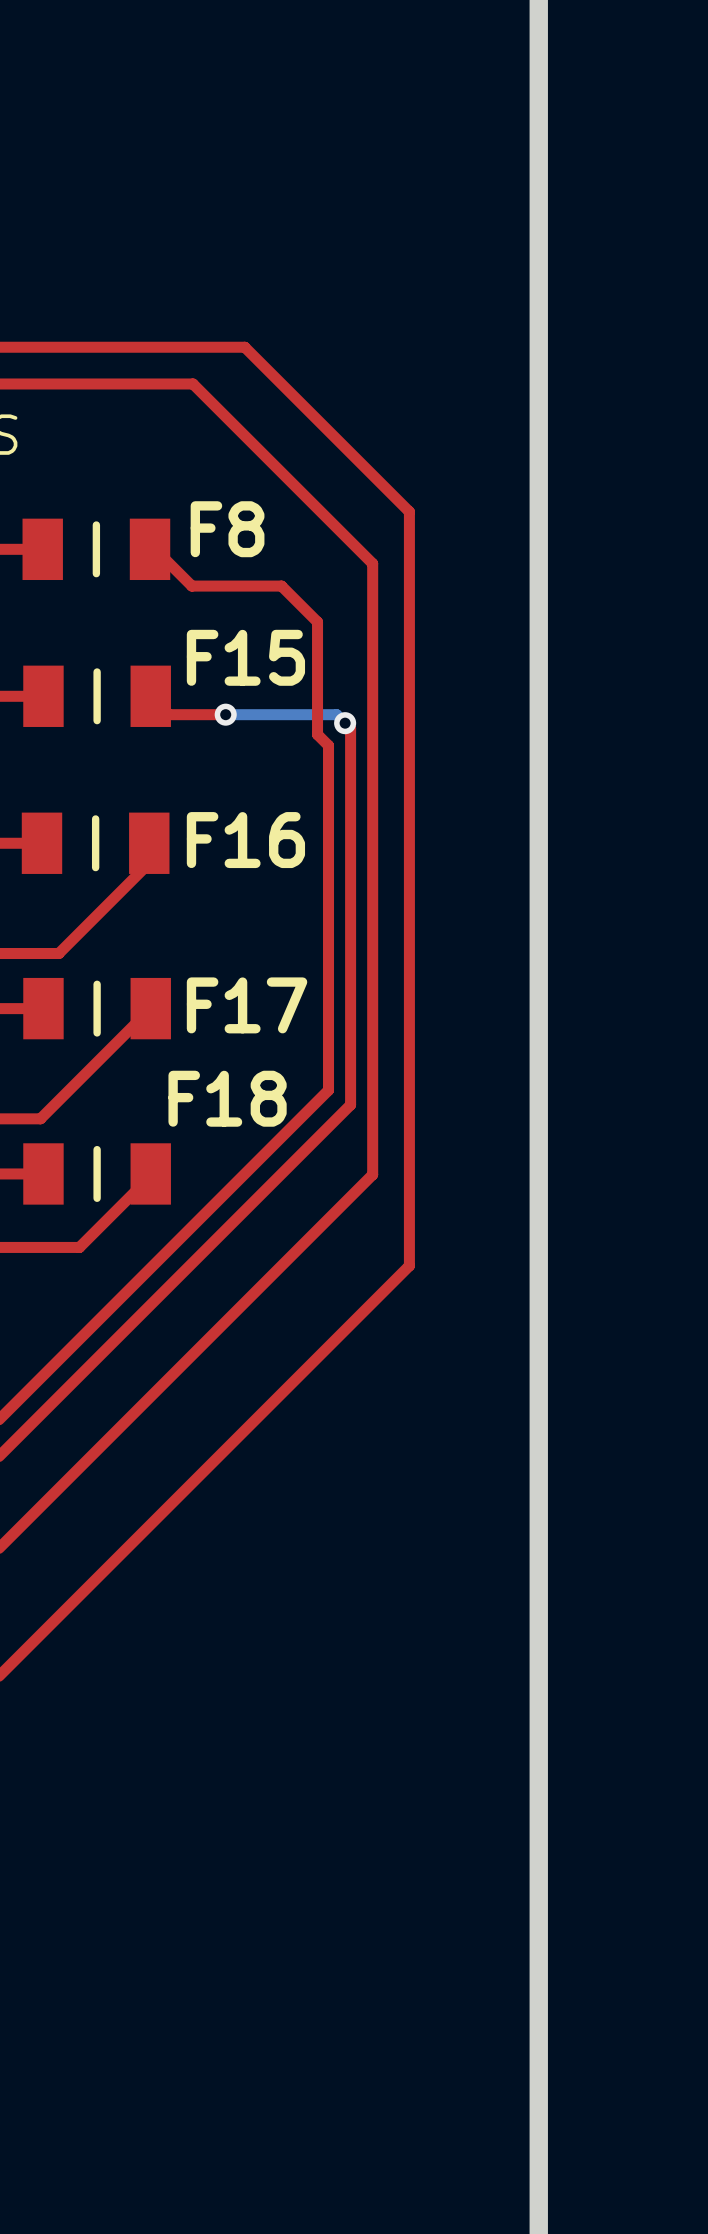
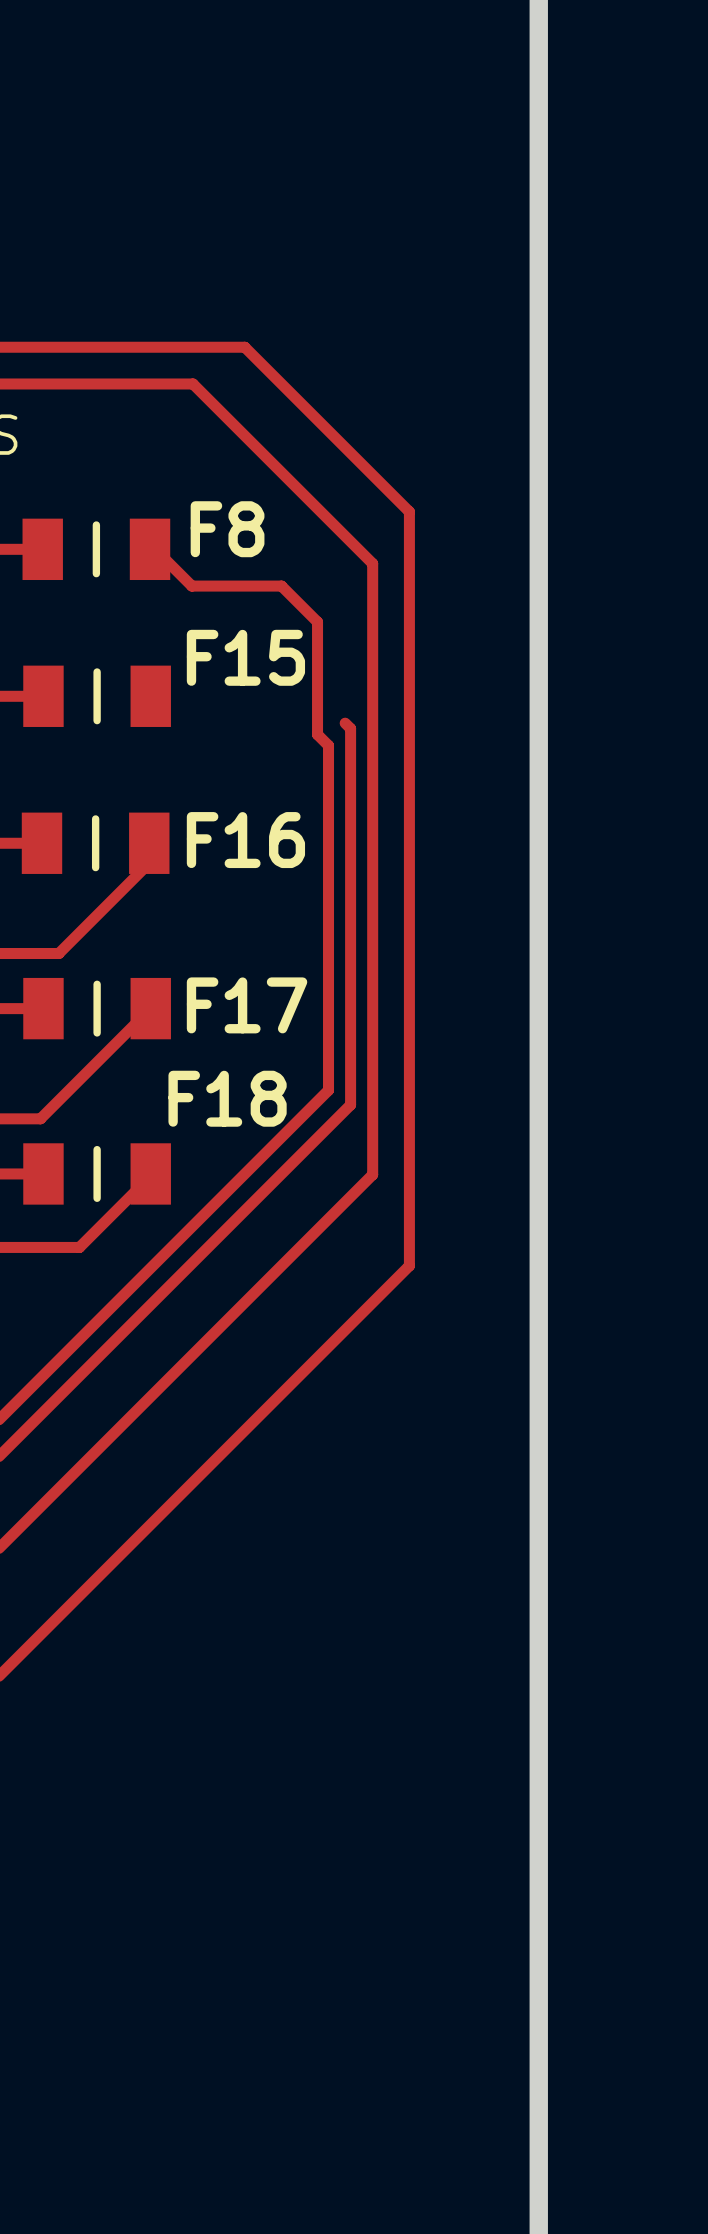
top track: (150, 696) (169, 714) (225, 714) -> none
bottom track: (225, 714) (336, 714) (345, 723) -> none
via: (225, 714) -> none
via: (345, 723) -> none

